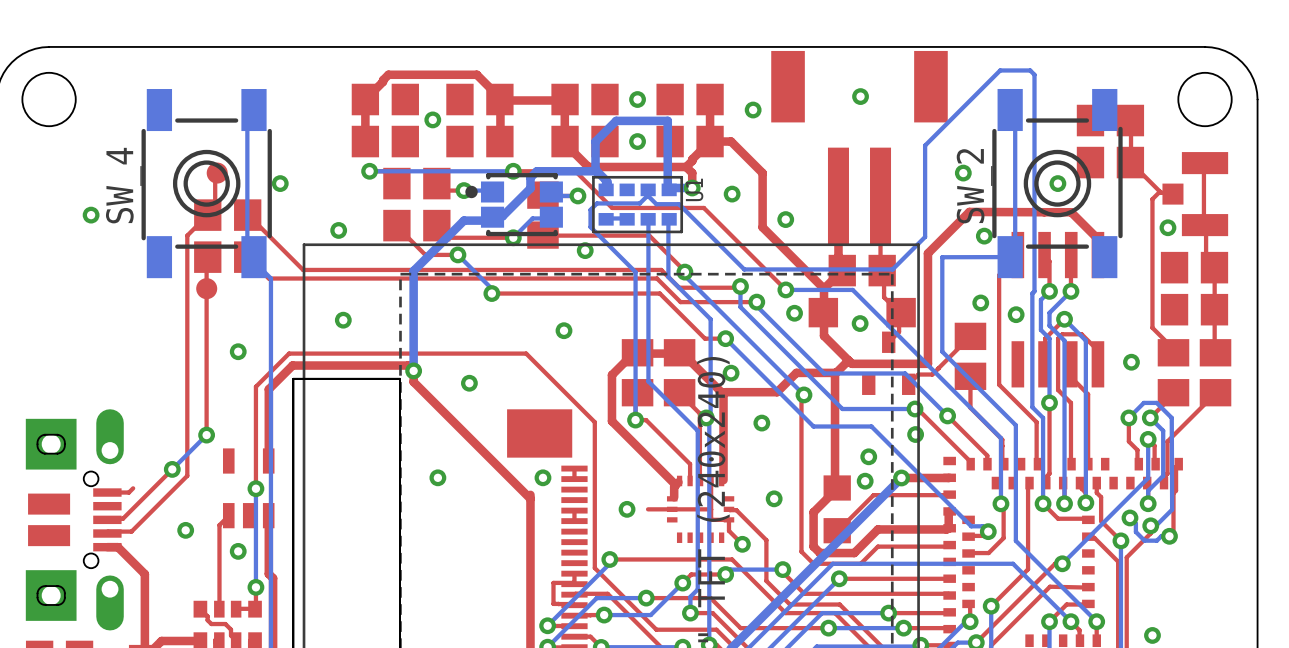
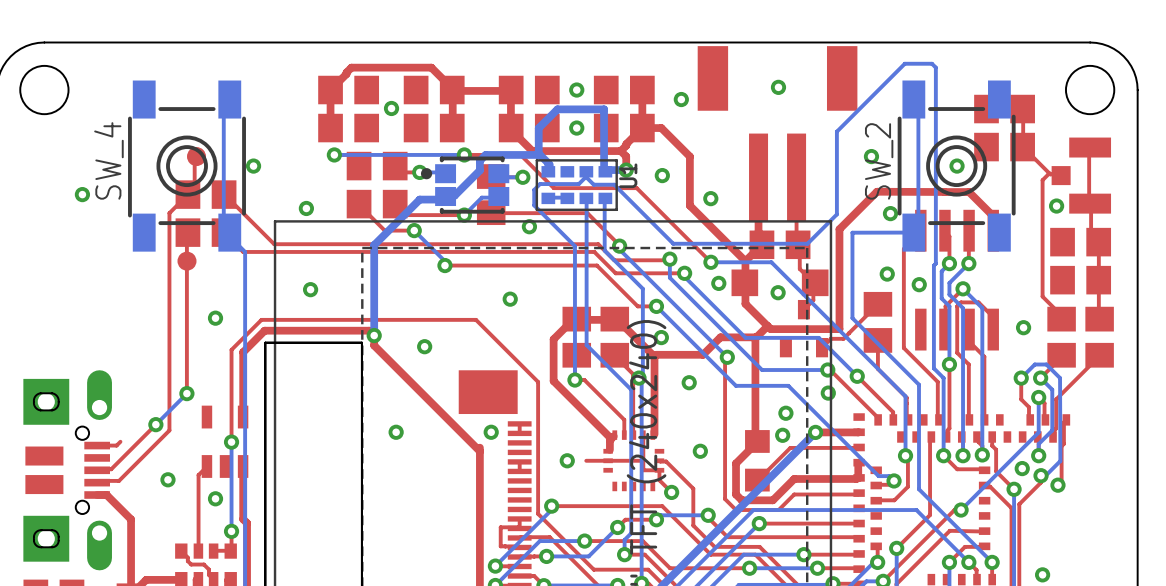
bottom track: (1129, 517) (1135, 523) (1135, 531) (1144, 540) (1156, 540) (1161, 536) (1169, 536) -> none

